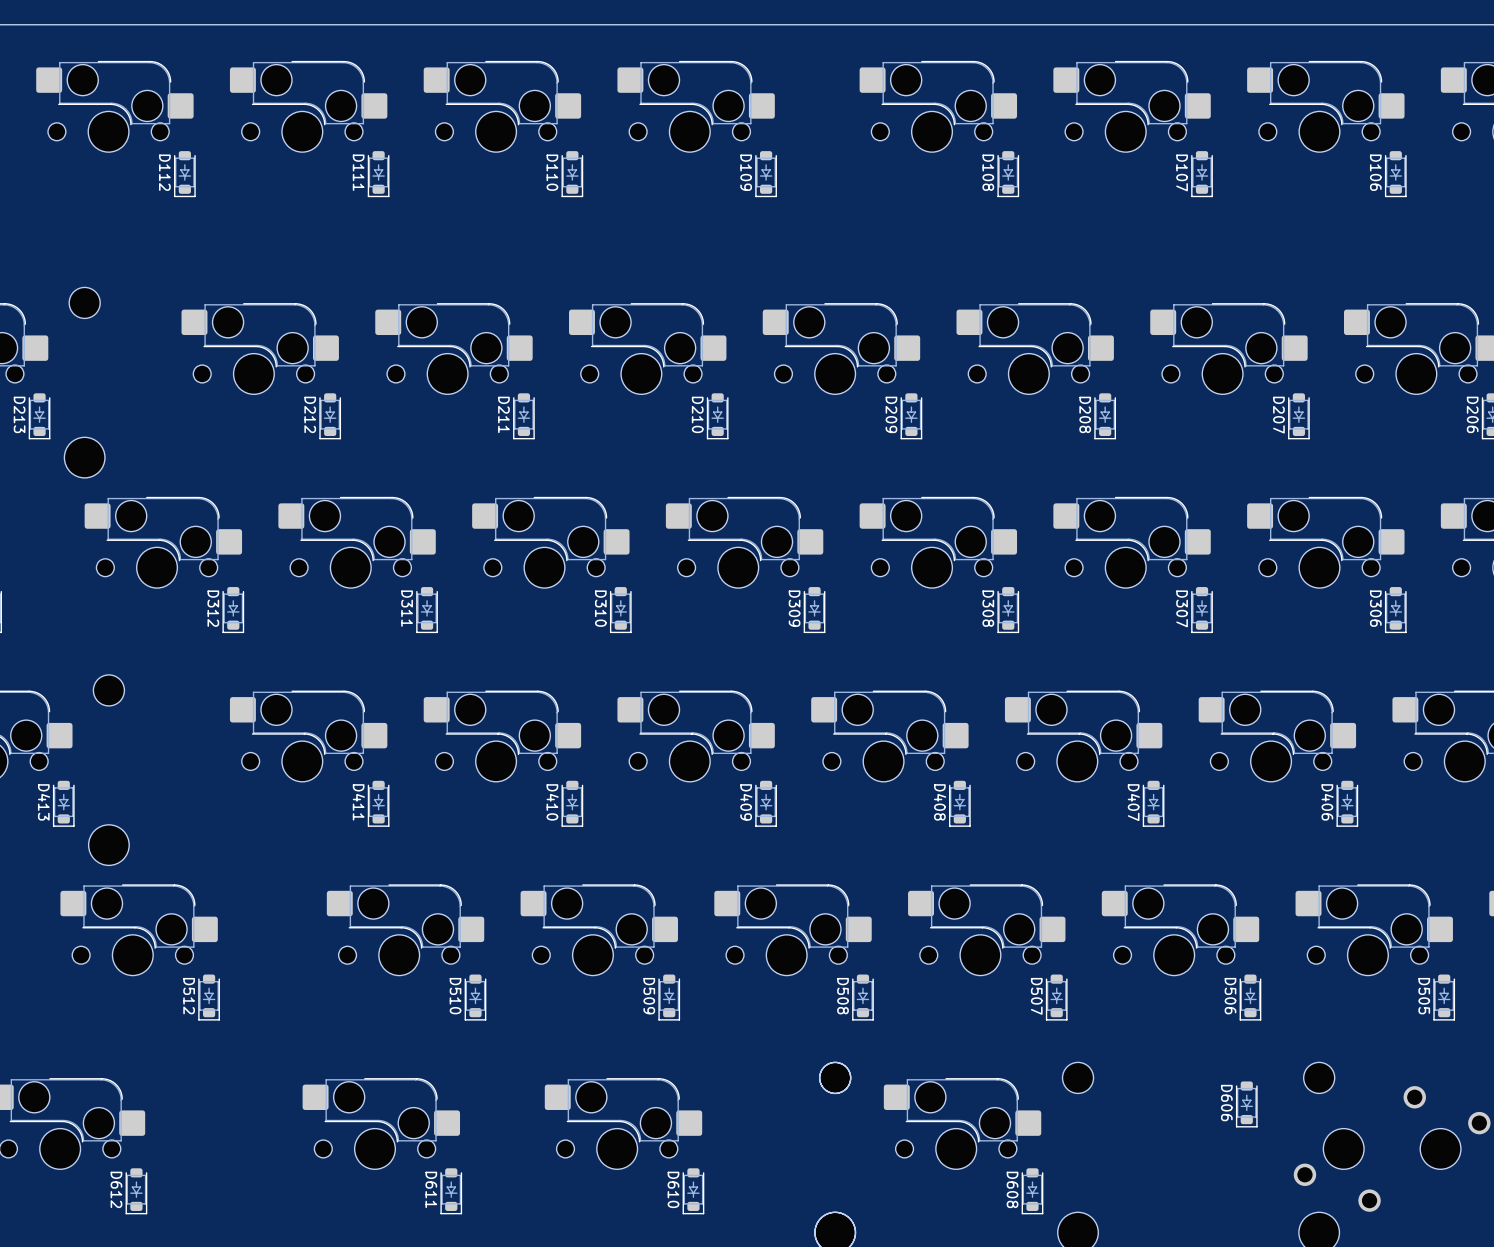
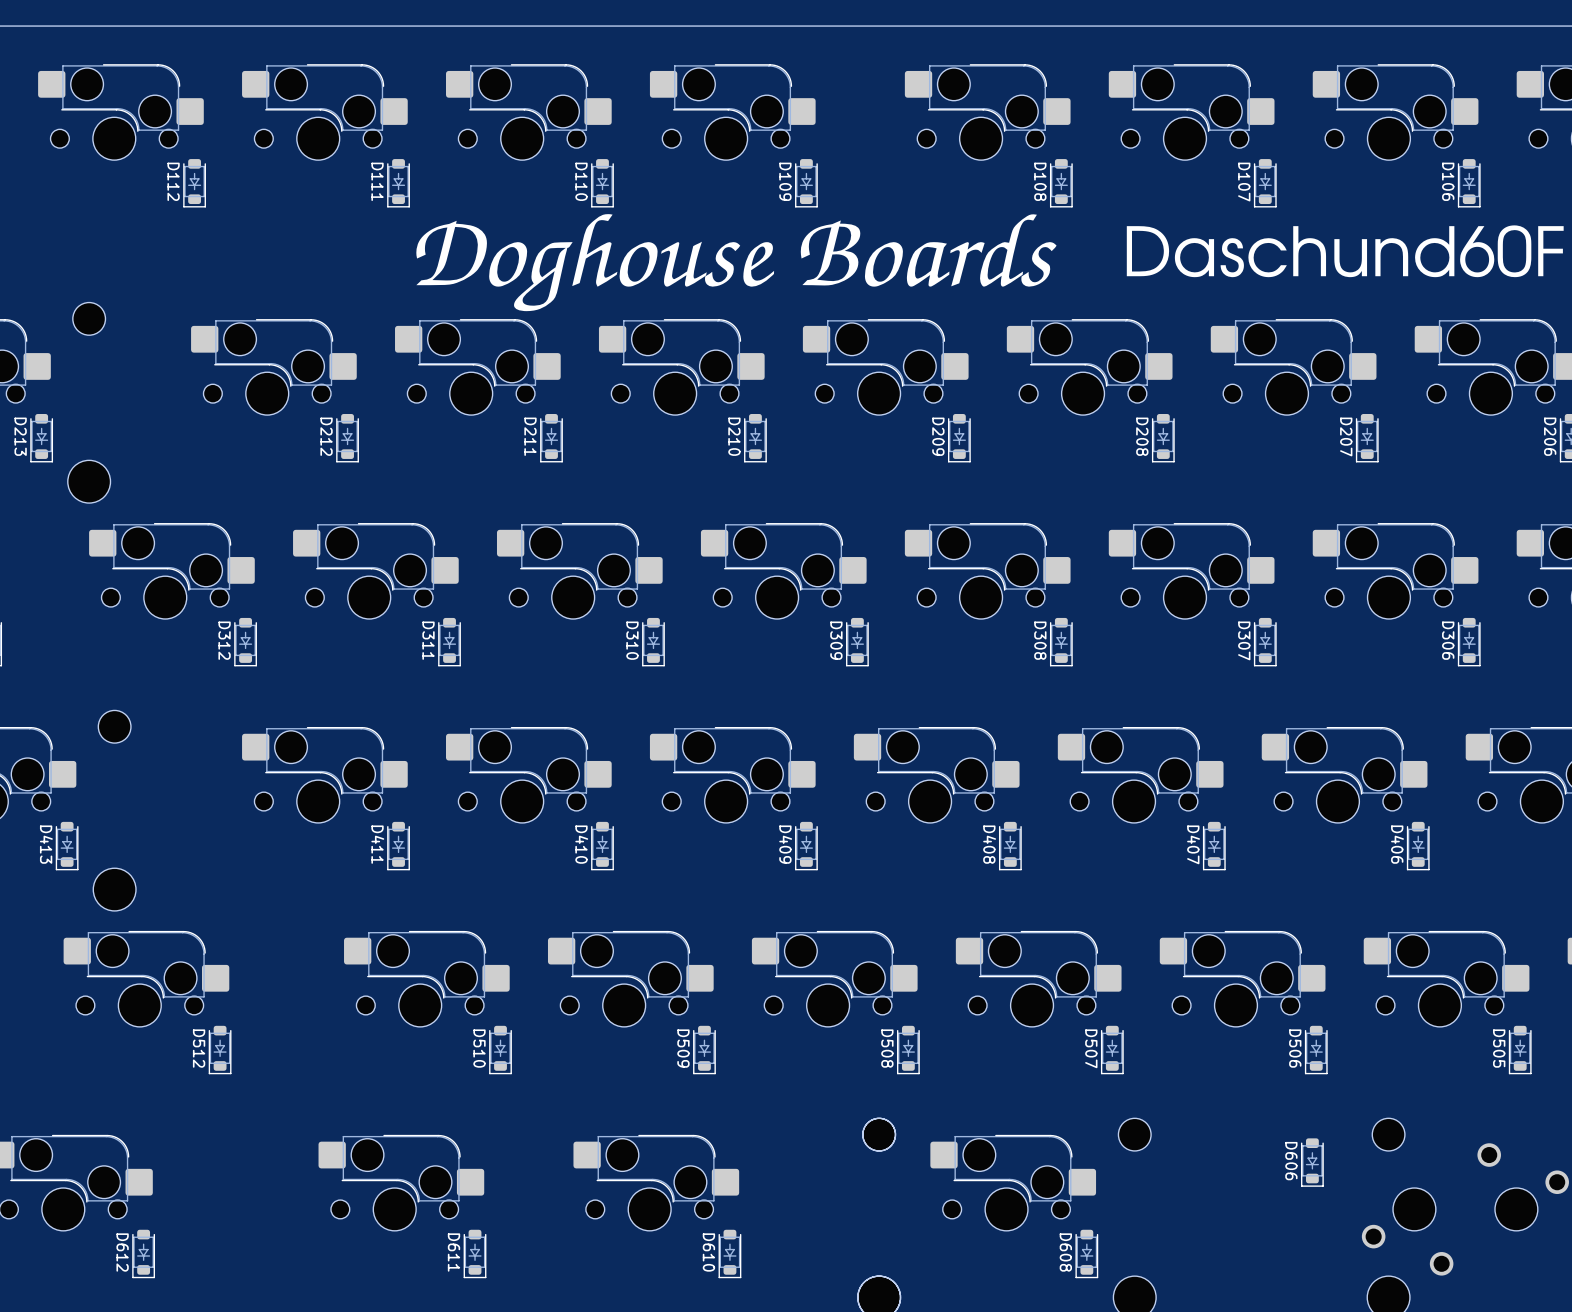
drawing: none -> [416, 214, 775, 312]
drawing: none -> [800, 214, 1057, 287]
drawing: none -> [1126, 225, 1564, 278]

